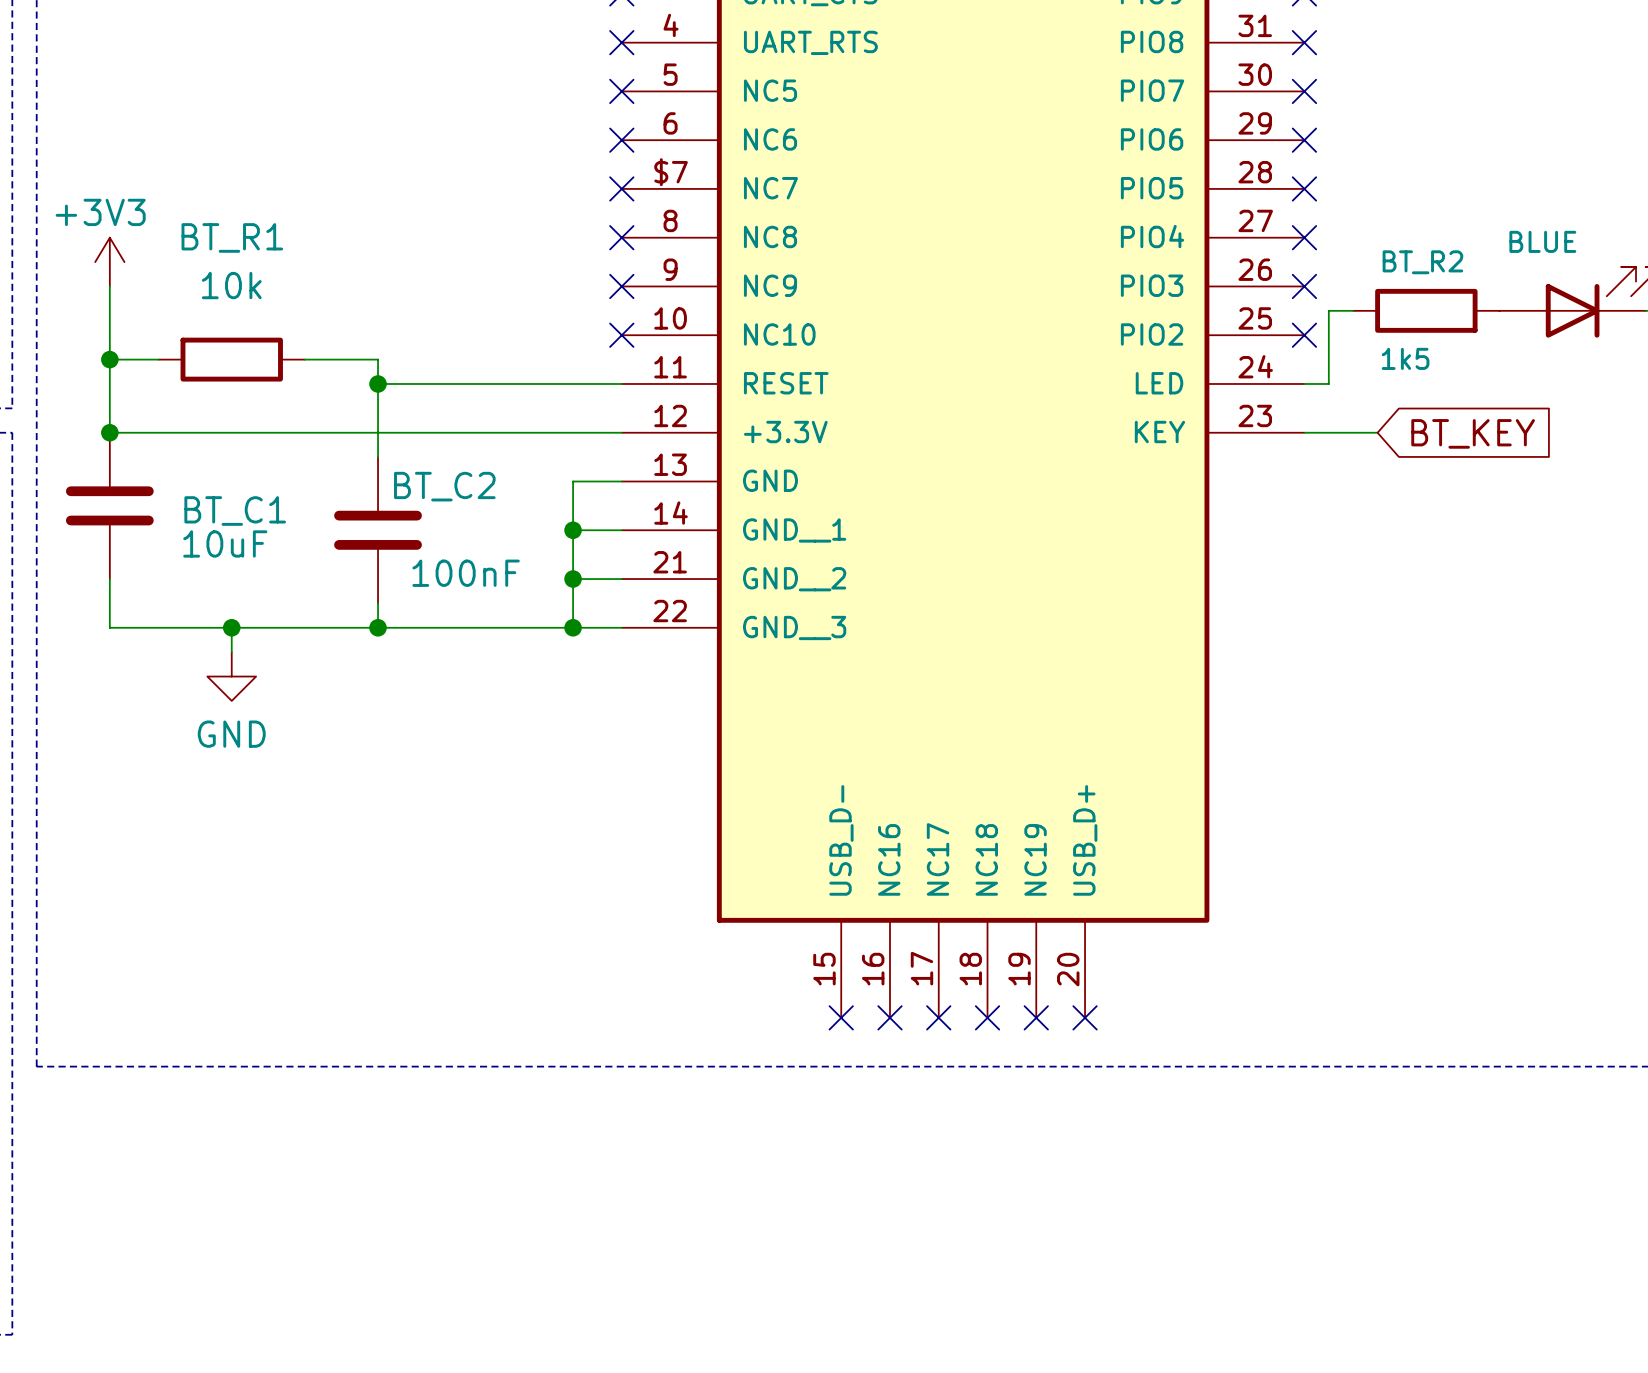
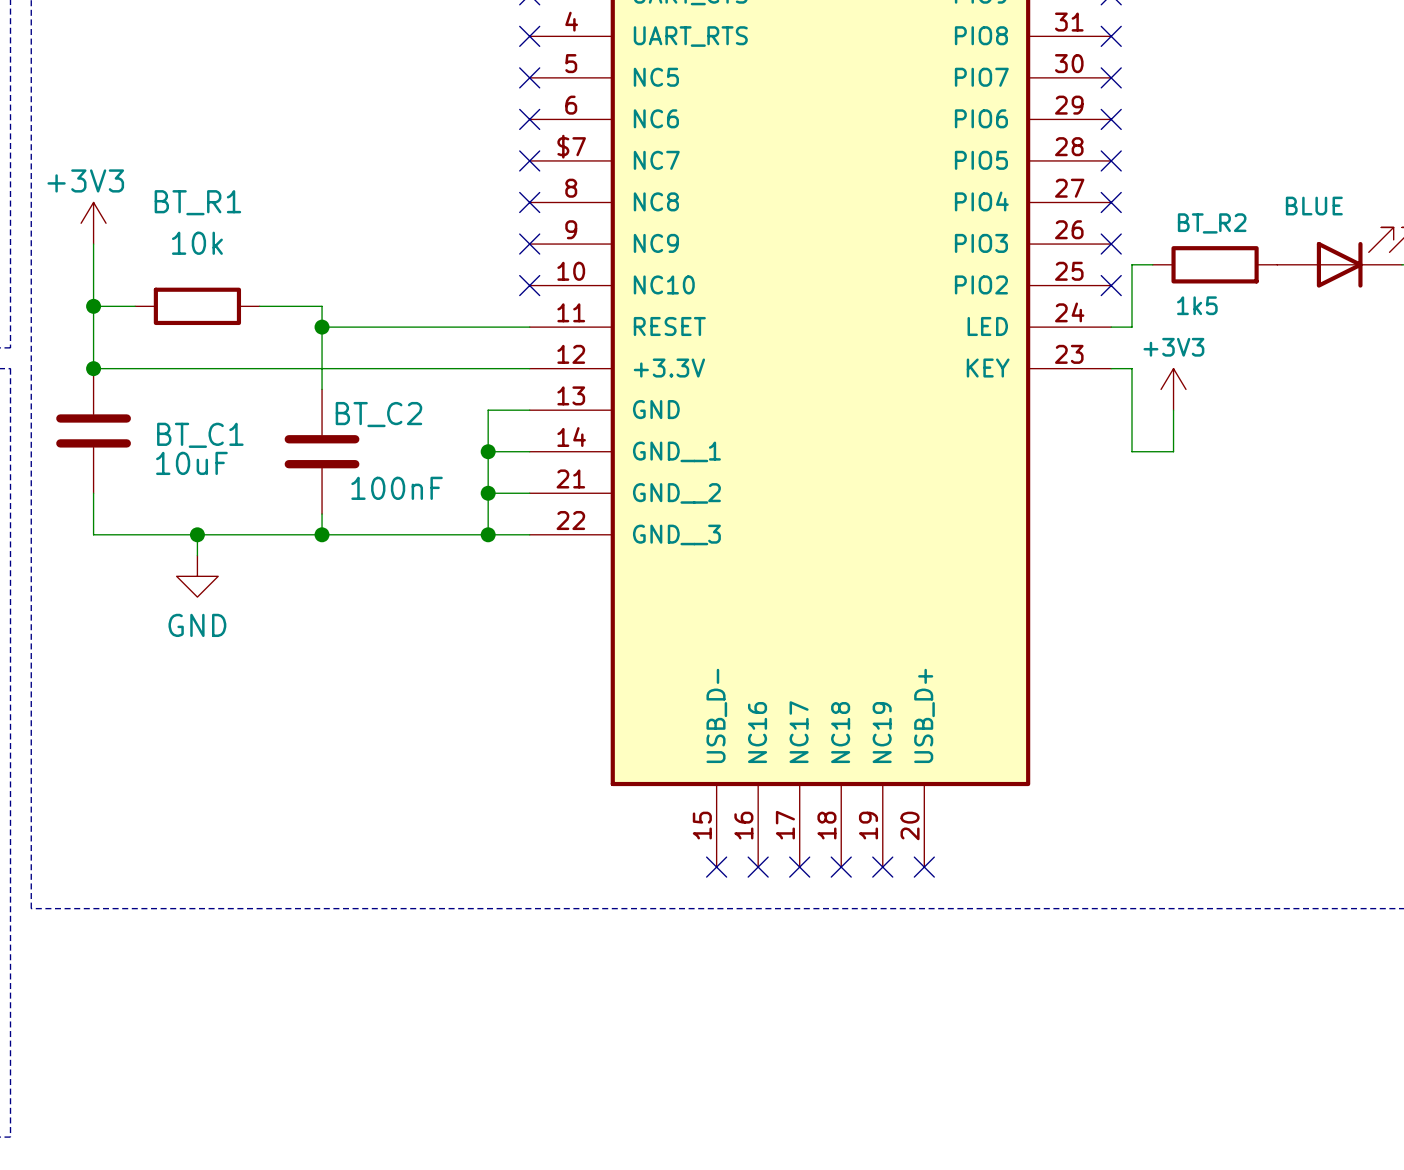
wire: (1328, 432) (1377, 432) -> (1132, 368) (1132, 451) (1173, 451) (1173, 410)
global label: BT_KEY (1473, 433) -> none
power symbol: none -> +3V3 (1173, 389)

